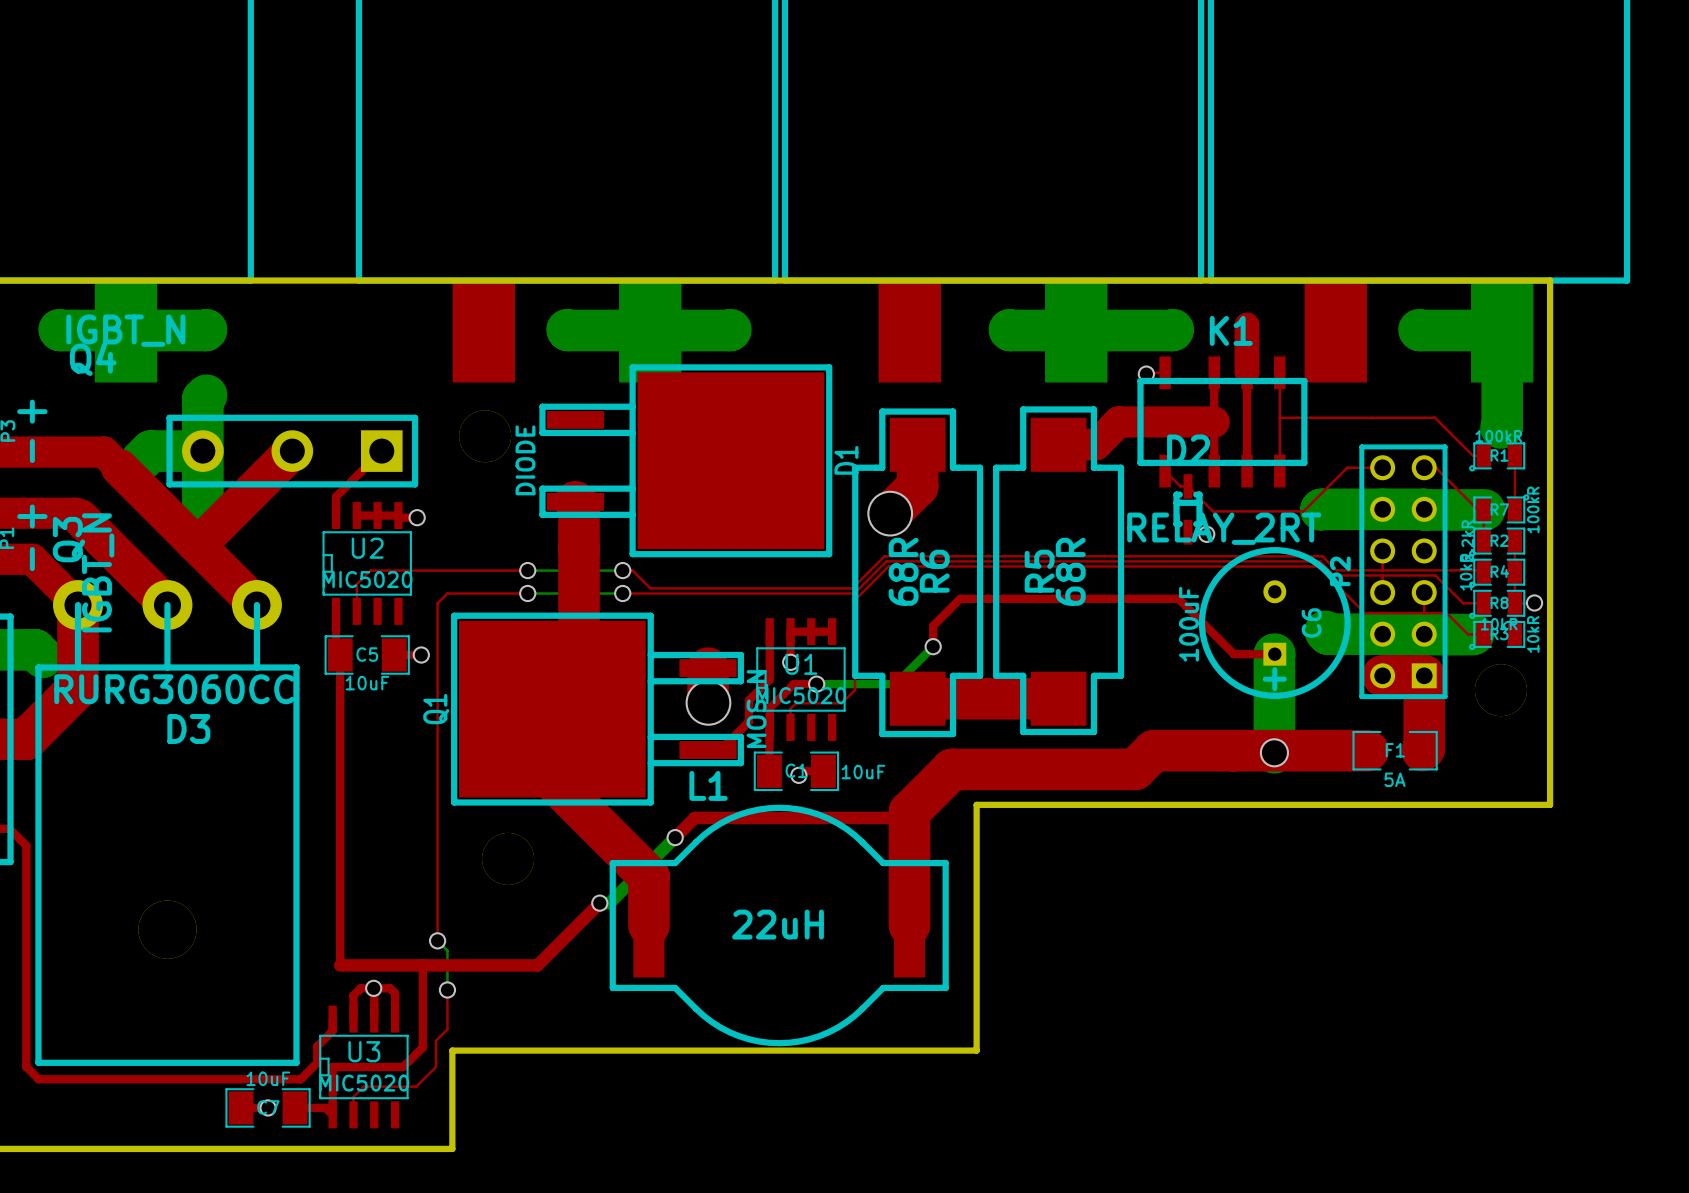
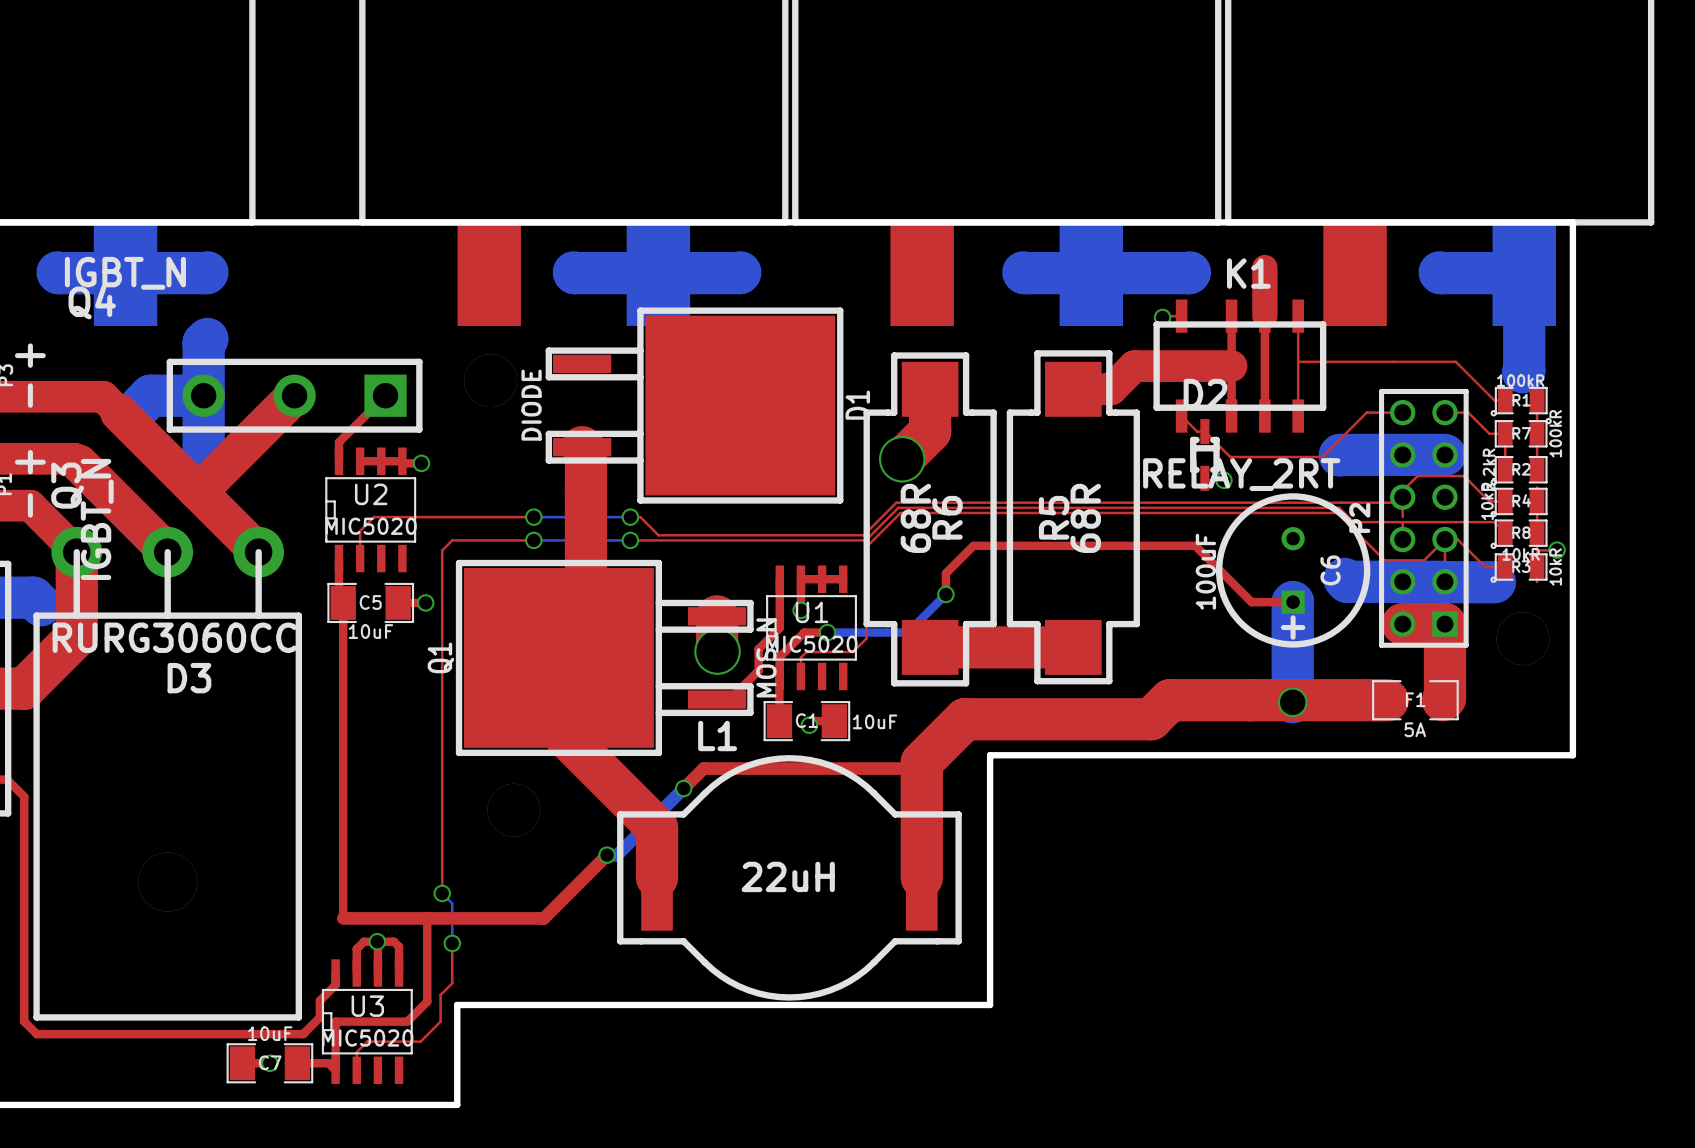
top track: (1435, 467) (1477, 509) (1483, 509) (1483, 541) -> (1456, 412) (1468, 412) (1489, 433) (1505, 433) (1505, 469)
R7 position: (1501, 508) -> (1523, 432)
bottom track: (1424, 509) (1484, 509) -> none
R2 position: (1497, 542) -> (1519, 470)
top track: (1322, 556) (1336, 570) (1481, 570) (1483, 572) -> (1341, 502) (1397, 502) (1402, 497) (1402, 490) (1417, 476) (1464, 476) (1489, 501) (1505, 501)
R4 position: (1497, 573) -> (1519, 502)
top track: (1435, 575) (1463, 603) (1483, 603) -> (1456, 522) (1494, 522) (1505, 533)
R8 position: (1497, 604) -> (1519, 534)
top track: (1403, 613) (1446, 613) (1468, 634) (1483, 634) -> (1424, 560) (1444, 539) (1457, 539) (1485, 567) (1505, 567)
R3 position: (1497, 635) -> (1519, 568)

